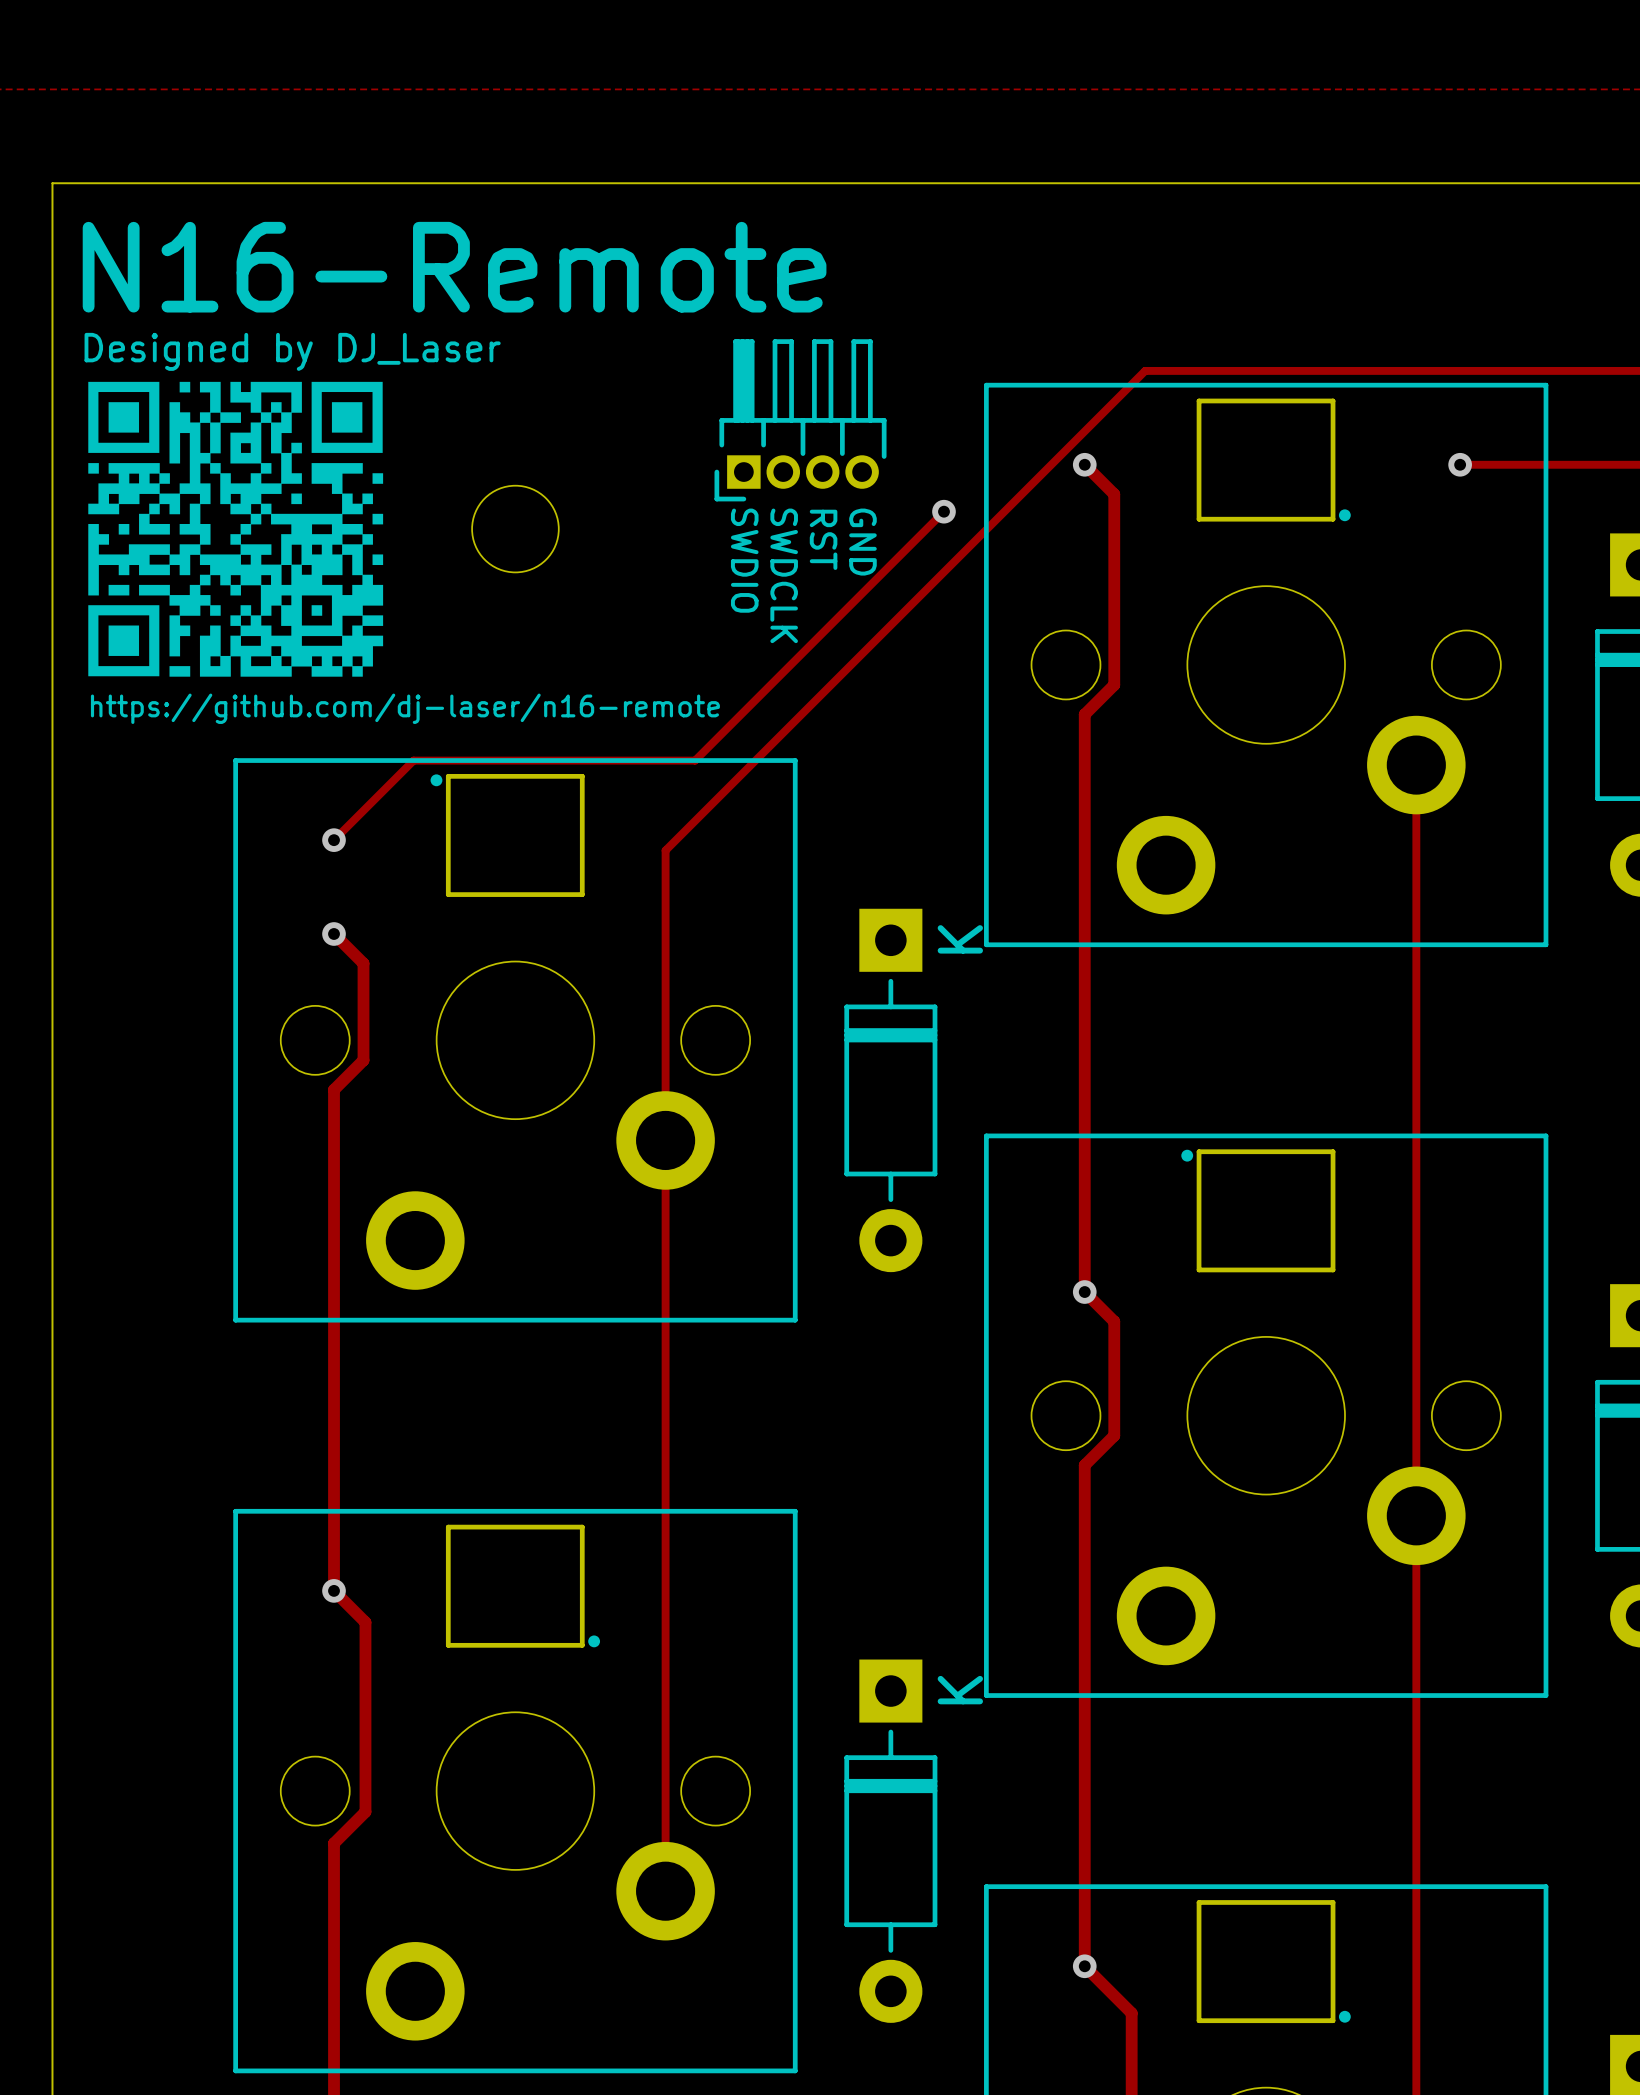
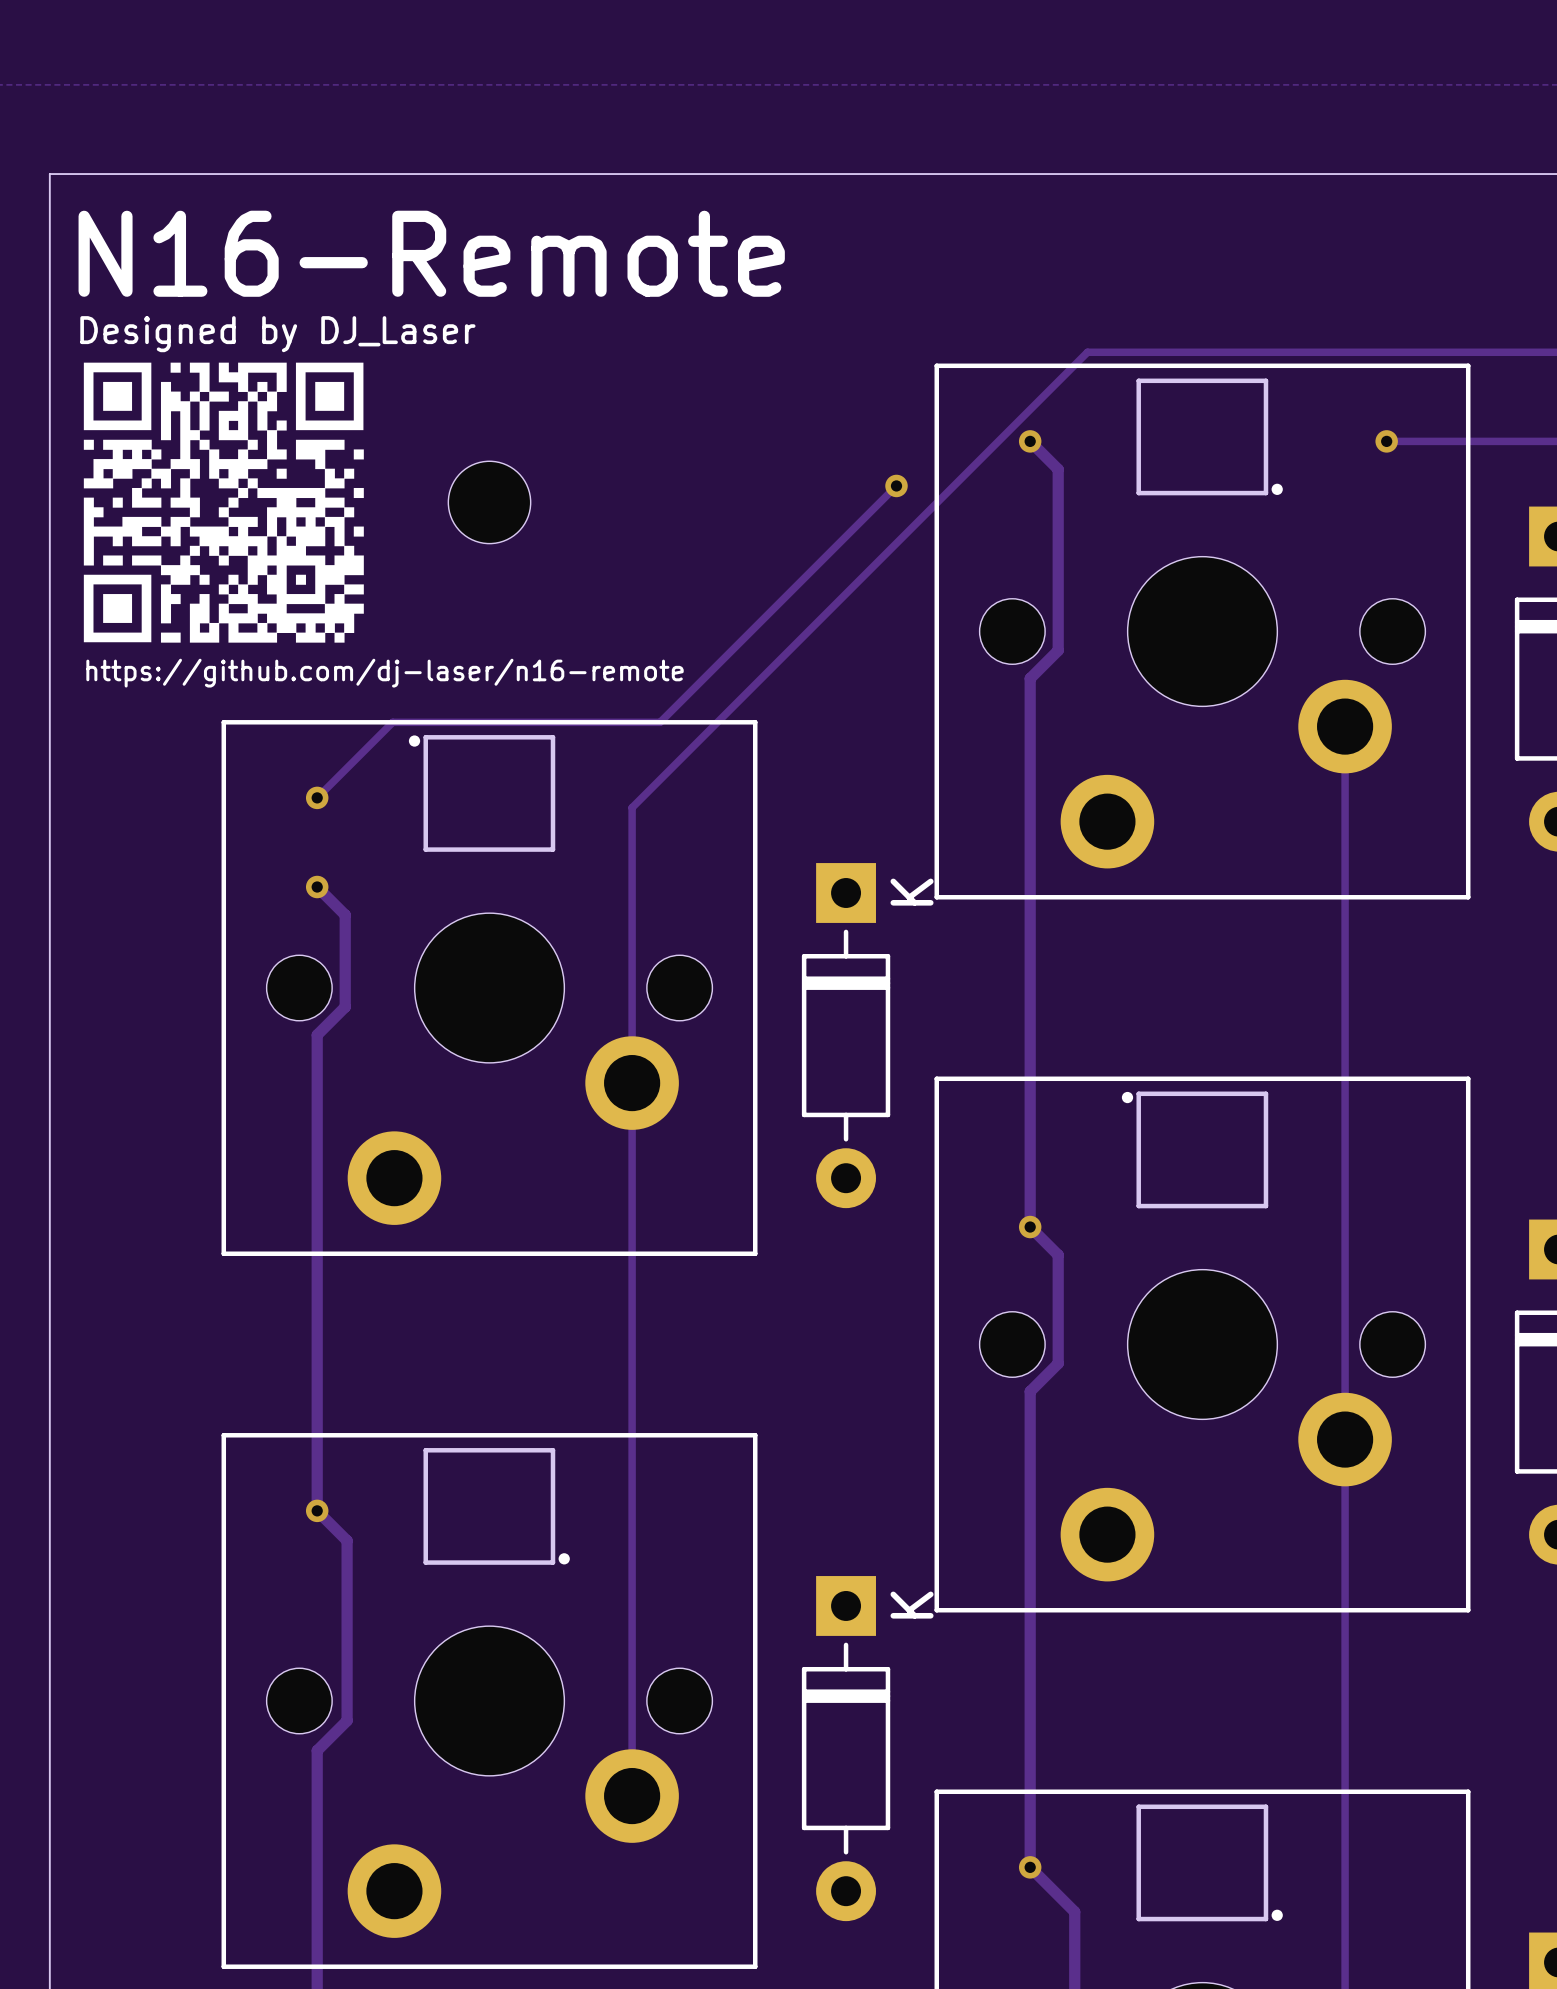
part: (800, 420) -> none
text: RST (823, 539) -> none
text: GND (862, 542) -> none
text: SWDIO (744, 560) -> none
text: SWDCLK (784, 575) -> none

